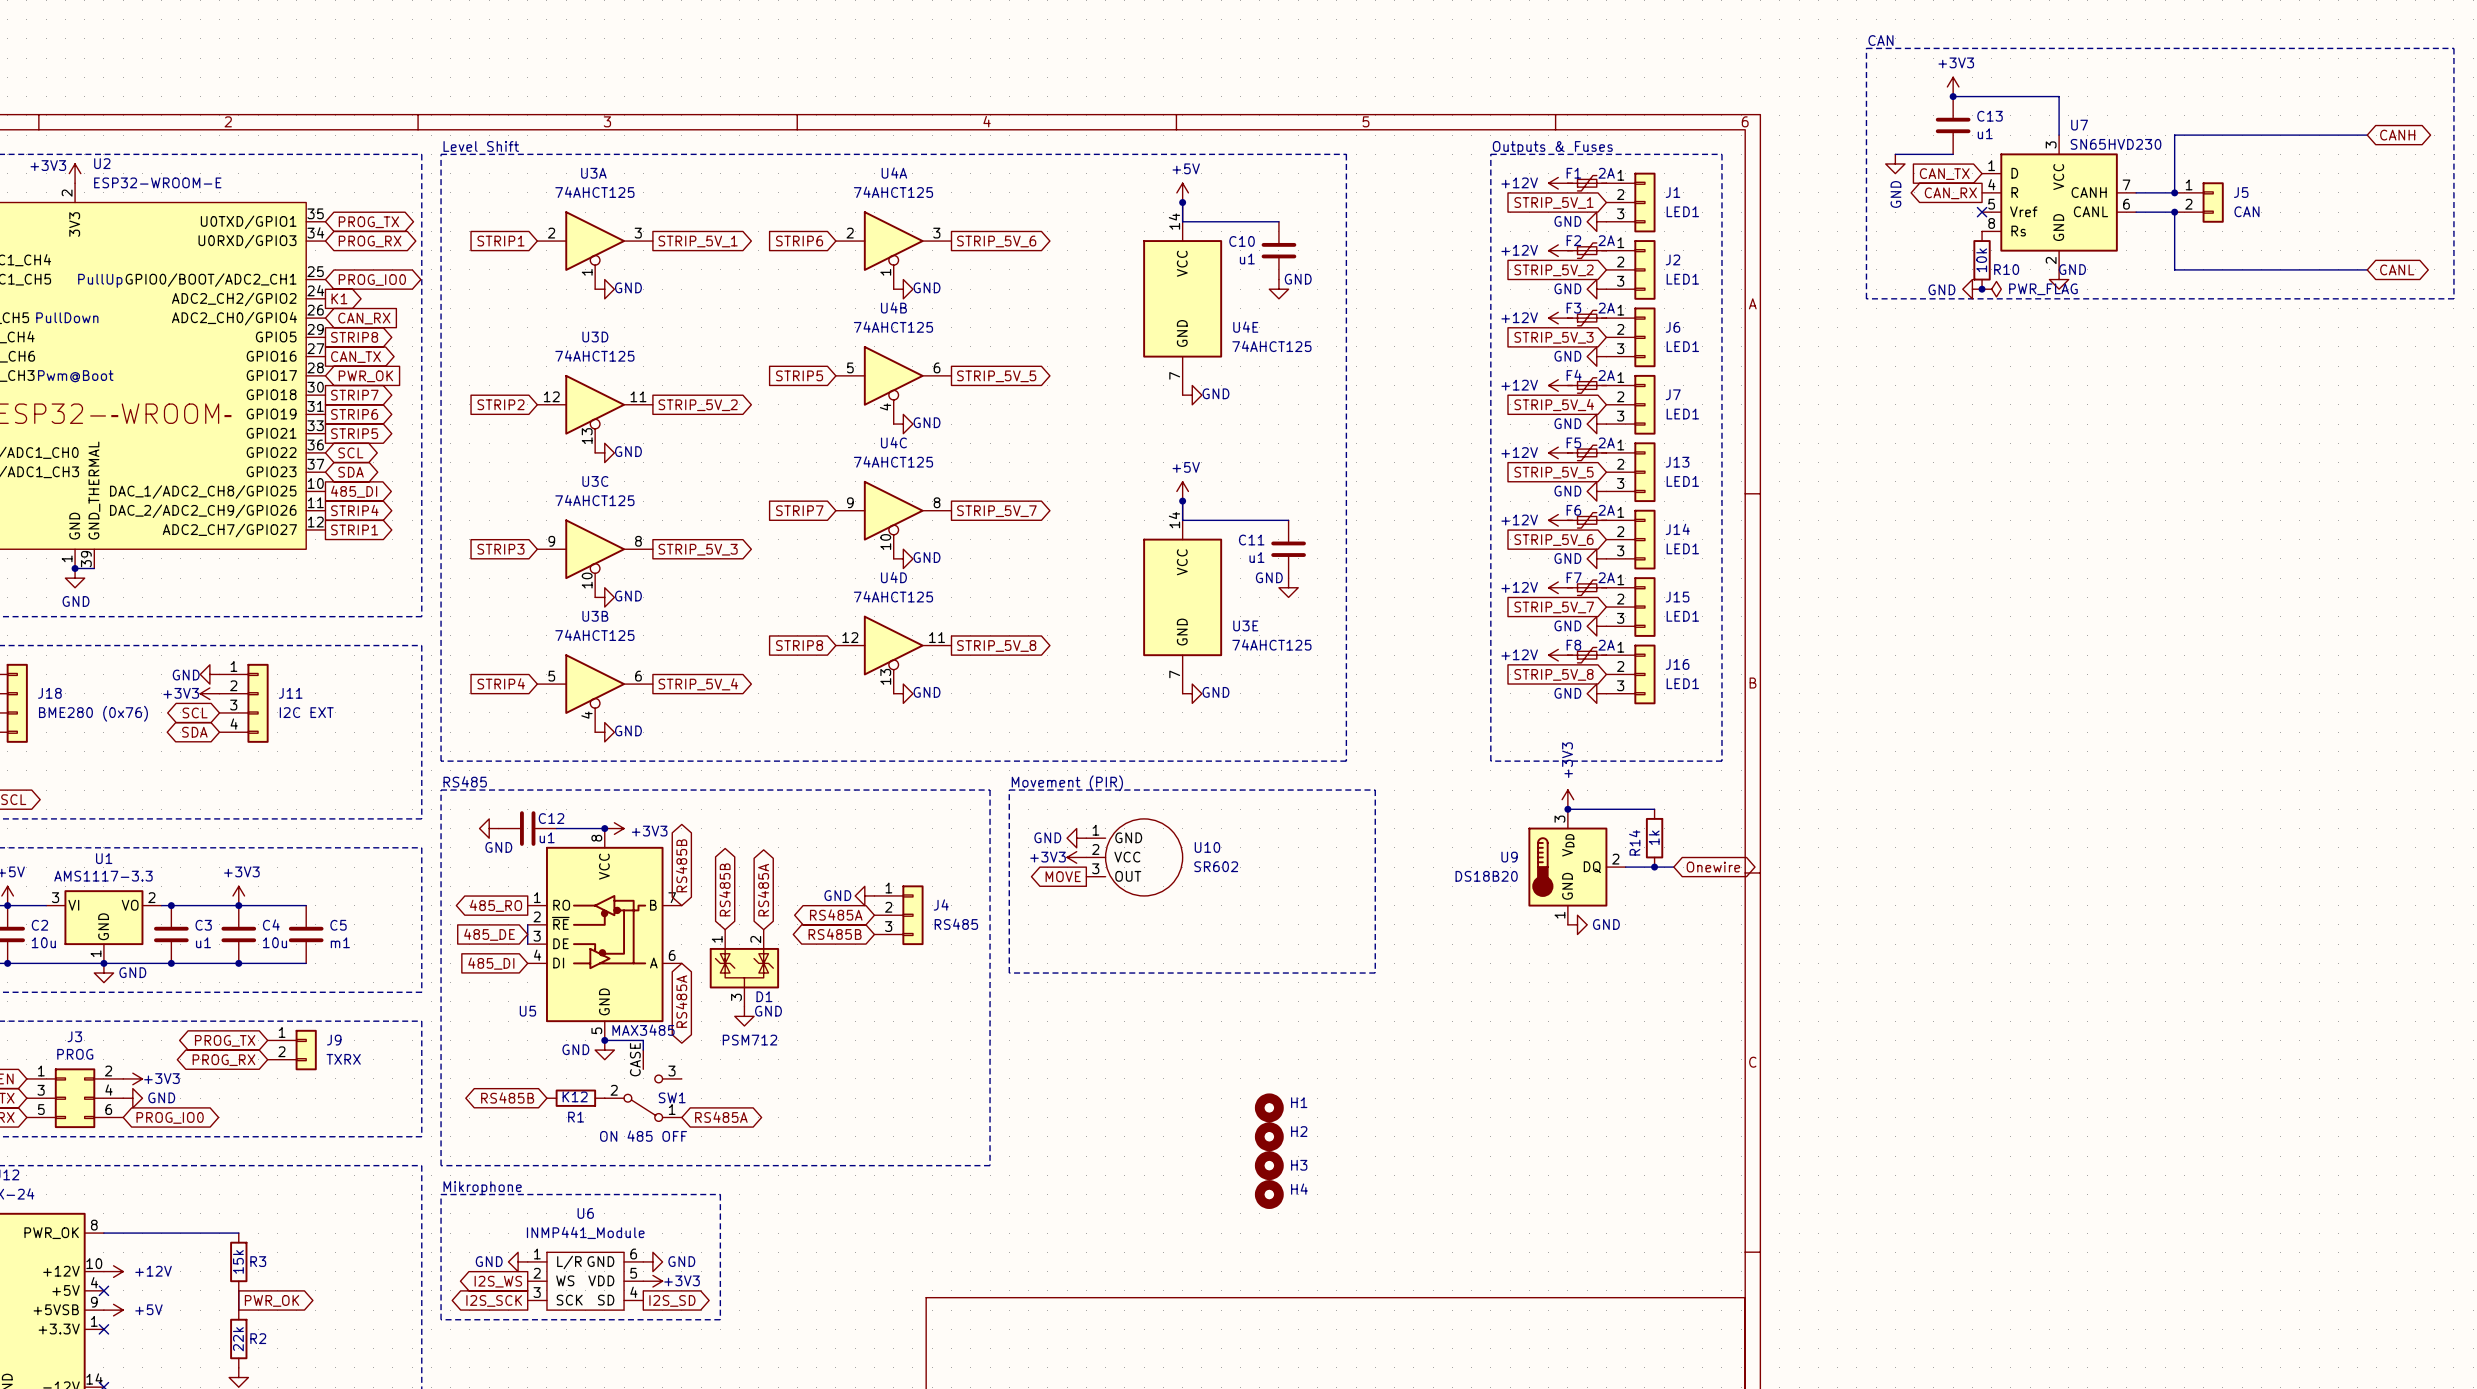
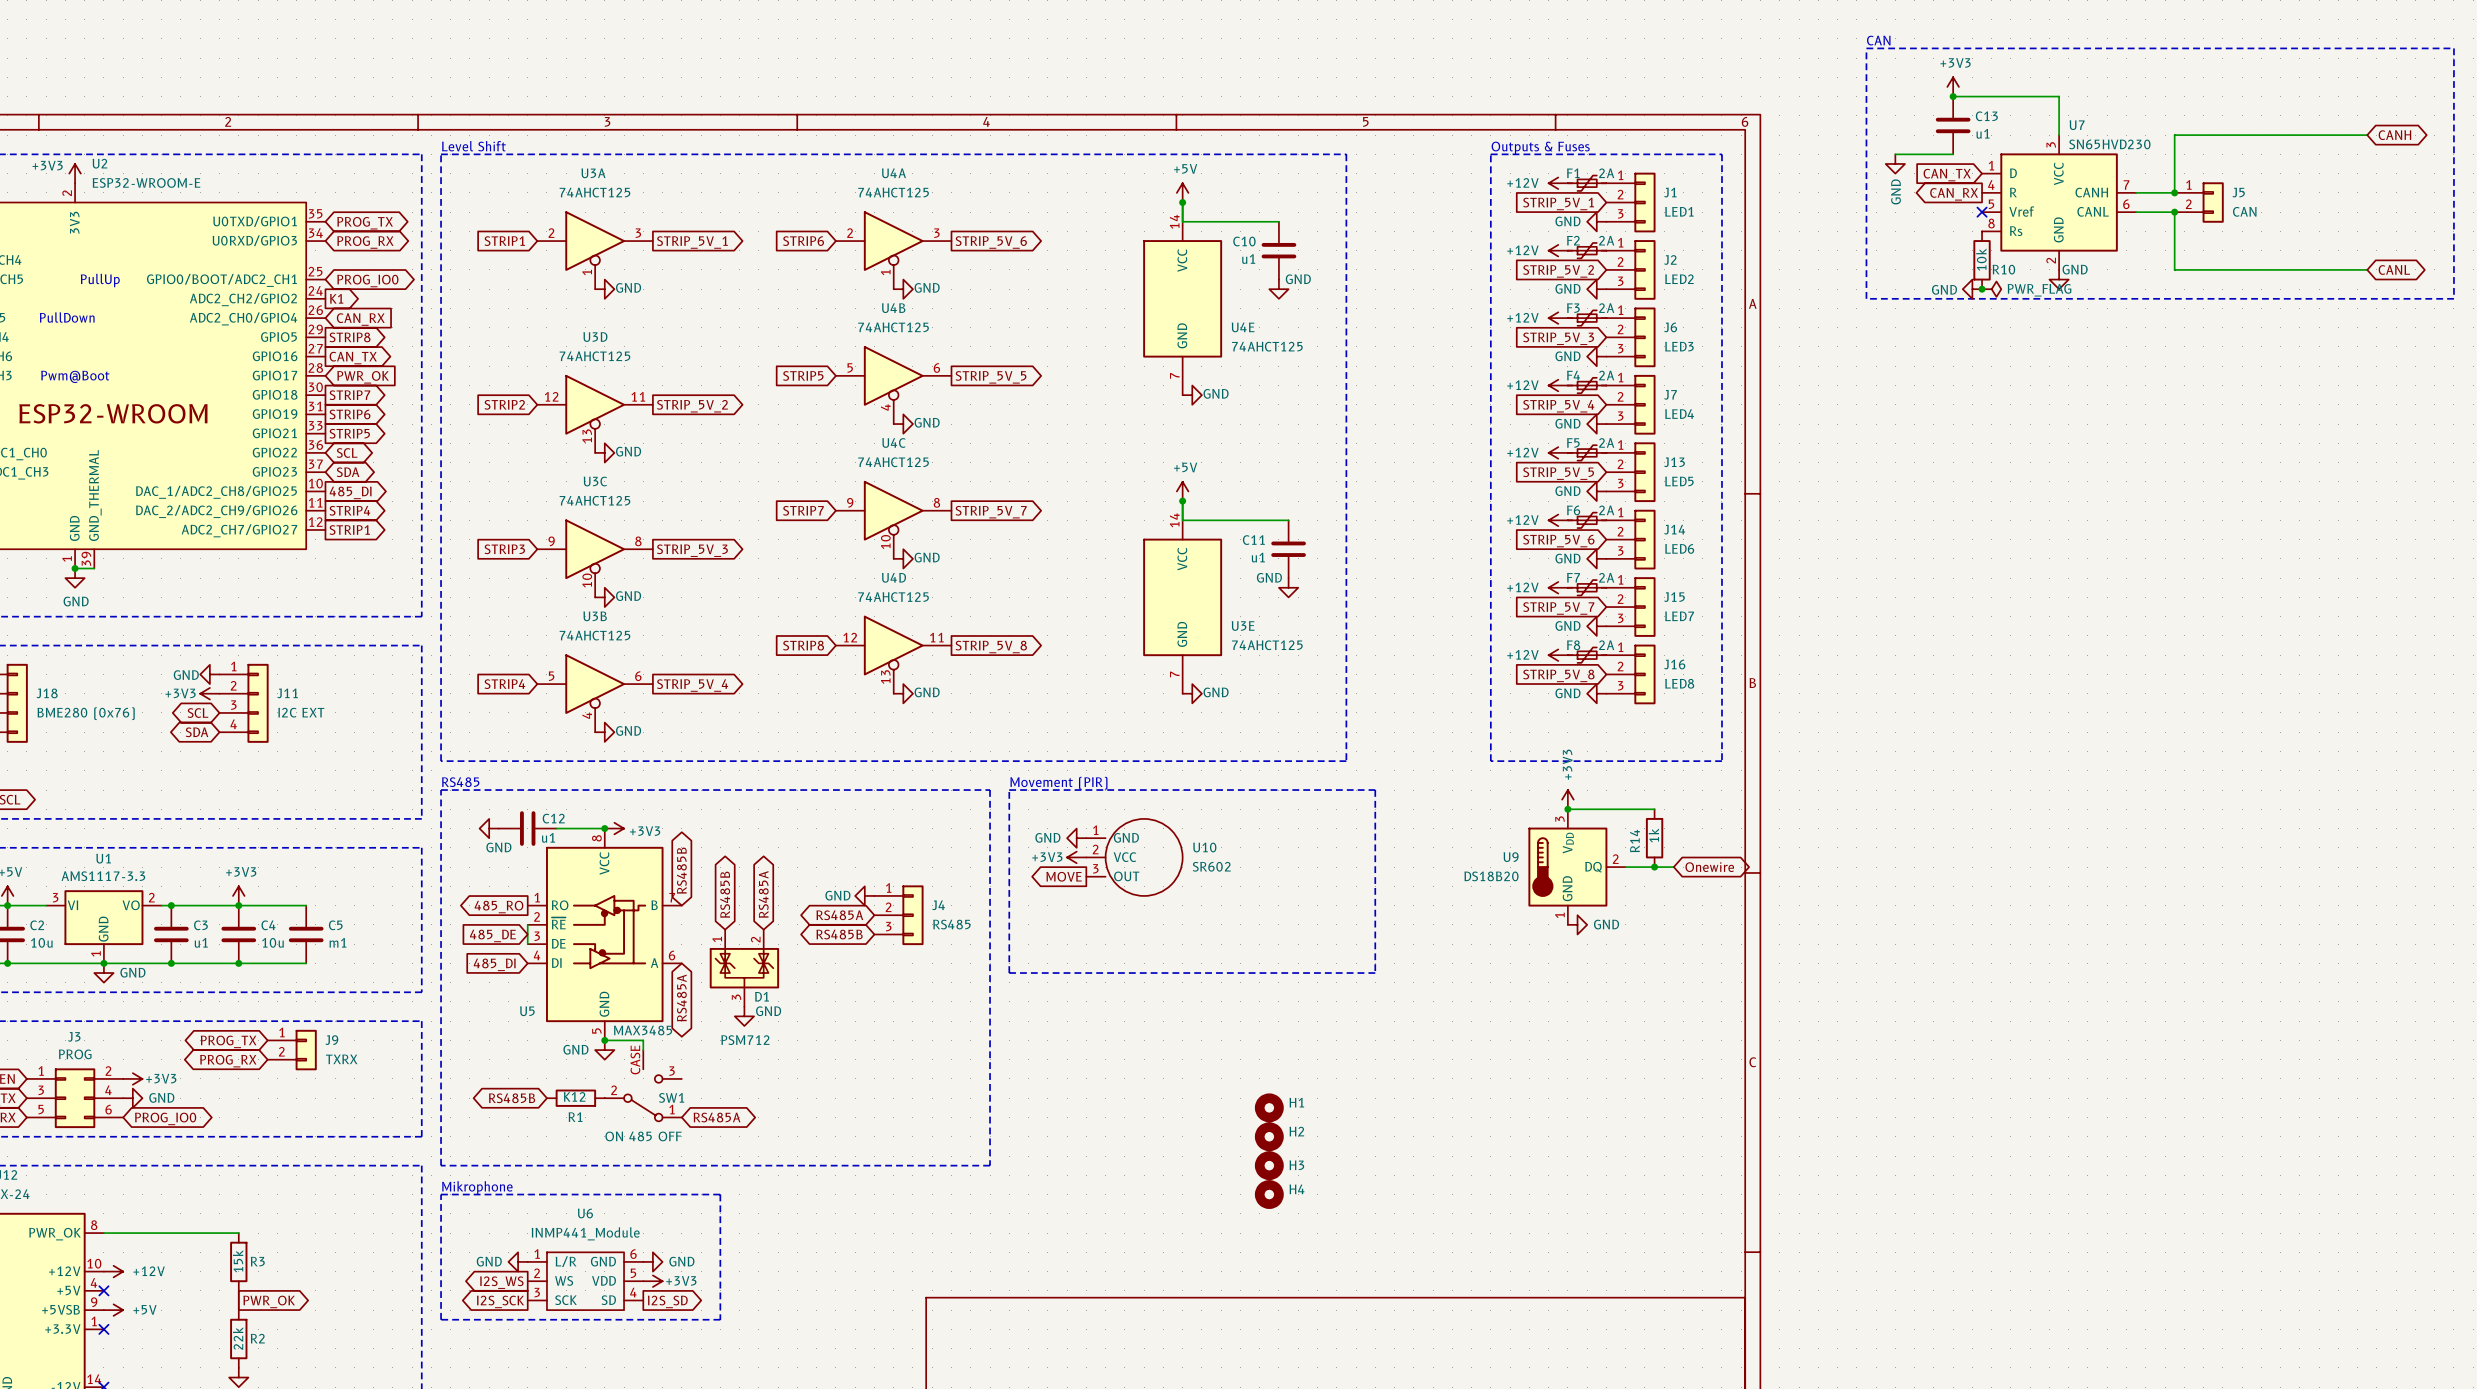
J2 value: LED1 (1682, 279) -> LED2 (1679, 279)
J6 value: LED1 (1682, 346) -> LED3 (1679, 346)
J7 value: LED1 (1682, 414) -> LED4 (1679, 414)
J13 value: LED1 (1682, 481) -> LED5 (1679, 481)
J14 value: LED1 (1682, 548) -> LED6 (1679, 548)
J15 value: LED1 (1682, 616) -> LED7 (1679, 616)
J16 value: LED1 (1682, 683) -> LED8 (1679, 683)

